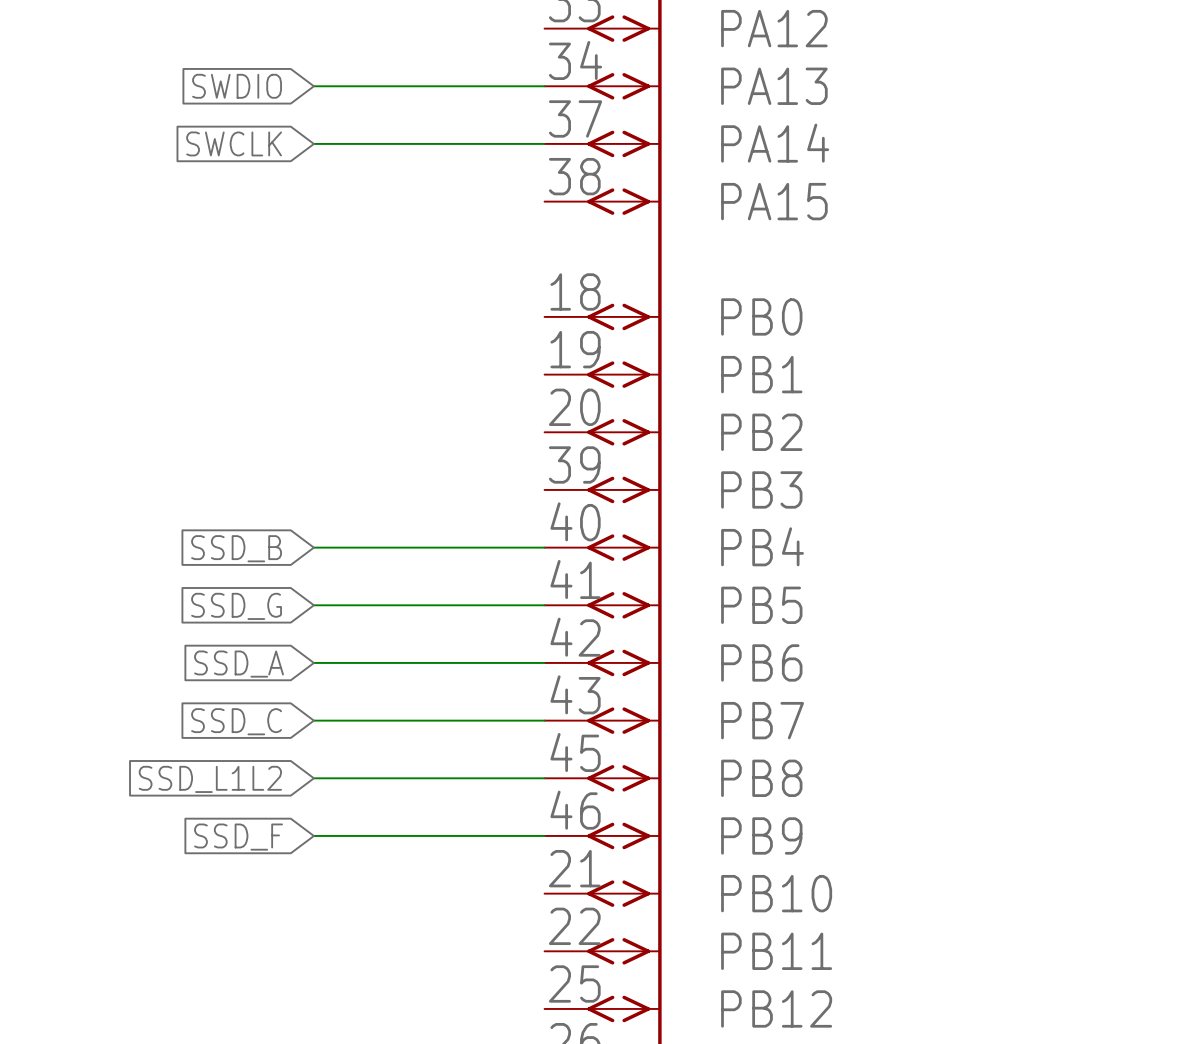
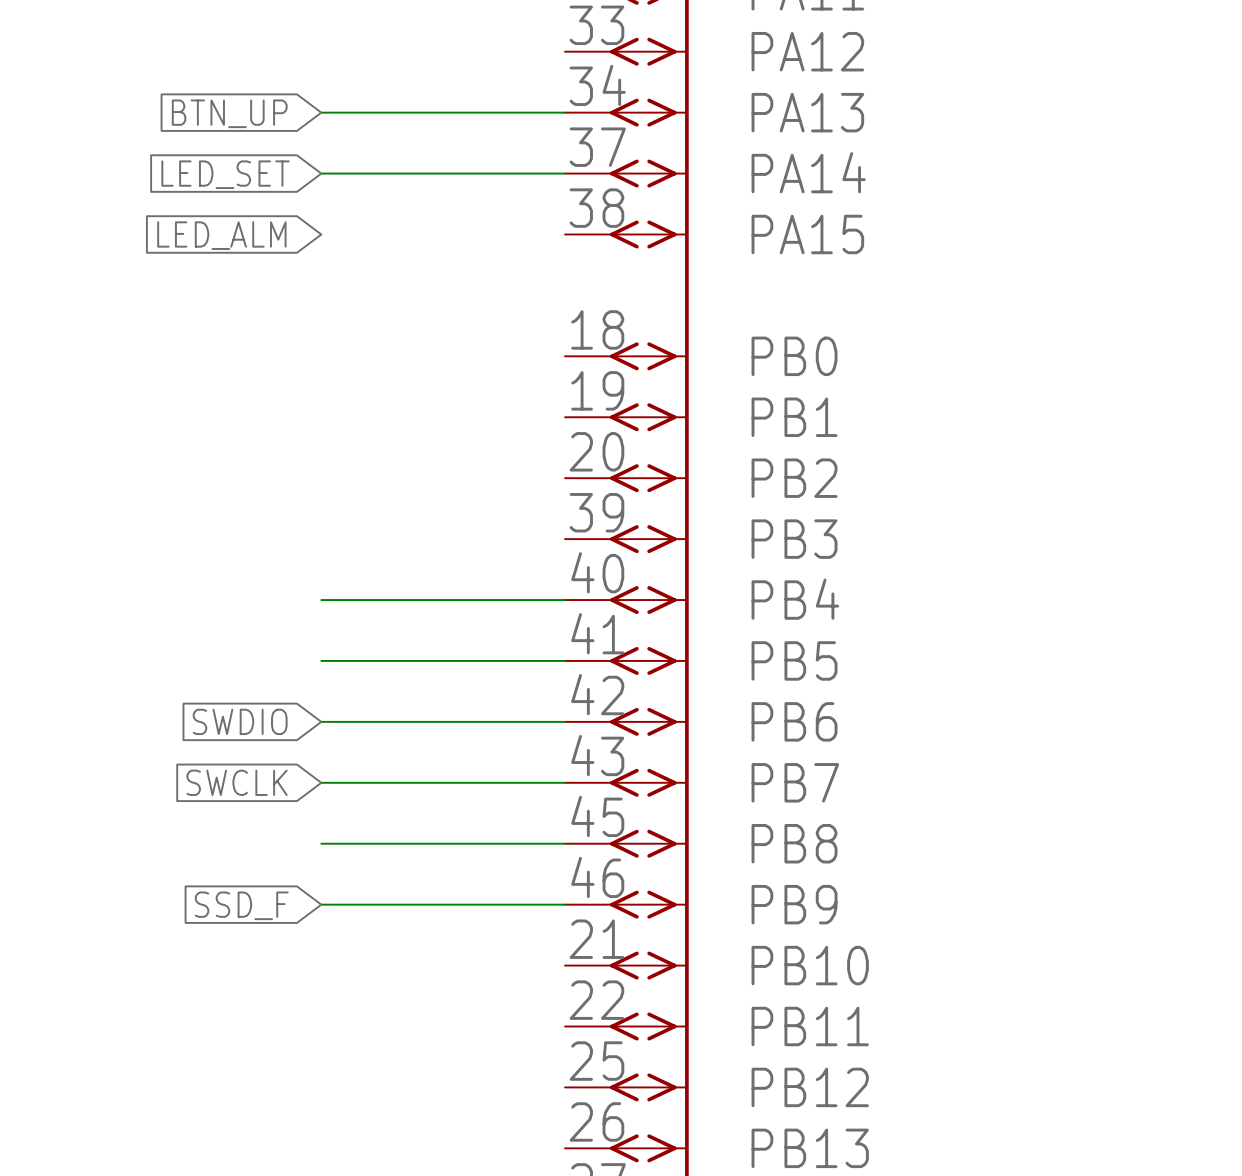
global label: SWDIO (237, 86) -> BTN_UP (229, 113)
global label: SWCLK (234, 143) -> LED_SET (225, 174)
global label: none -> LED_ALM (221, 235)
global label: SSD_B (236, 548) -> none
global label: SSD_G (236, 606) -> none
global label: SSD_A (239, 664) -> SWDIO (240, 721)
global label: SSD_C (236, 721) -> SWCLK (237, 782)
global label: SSD_L1L2 (210, 779) -> none

